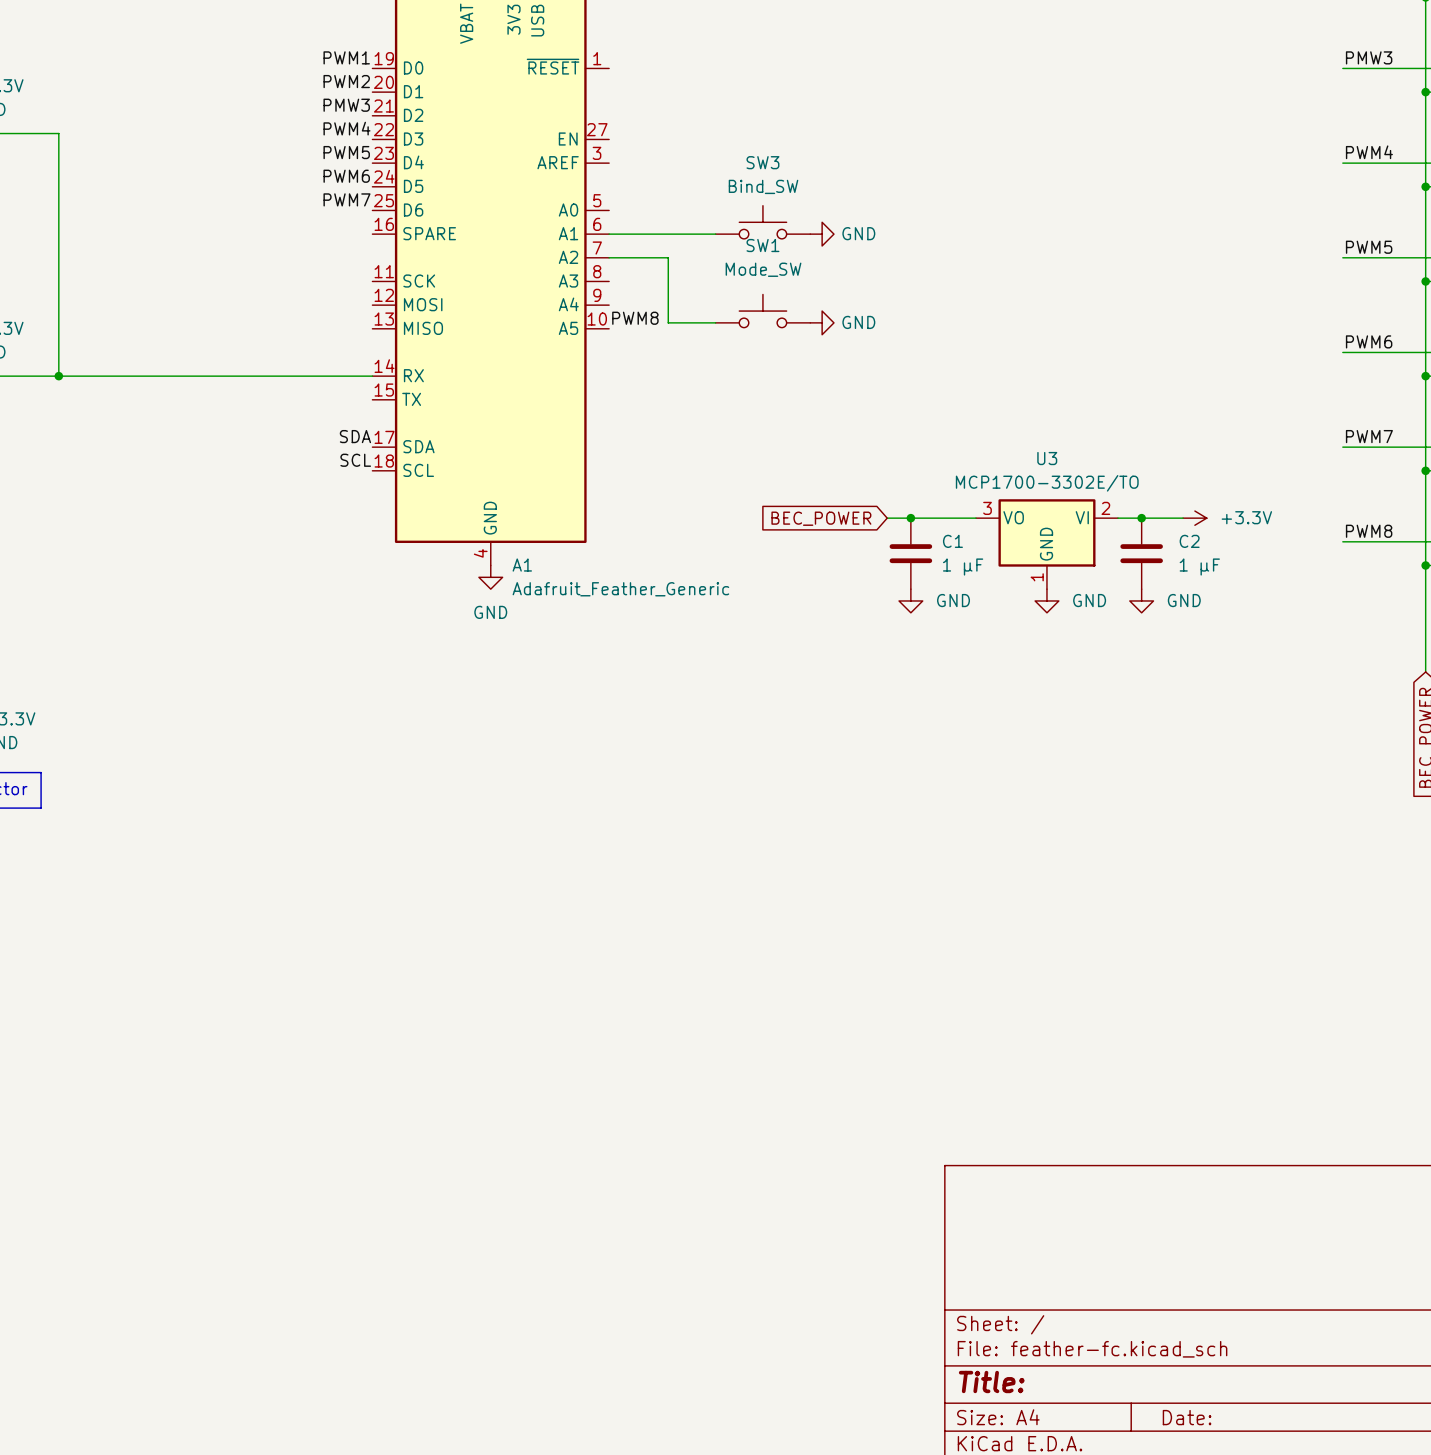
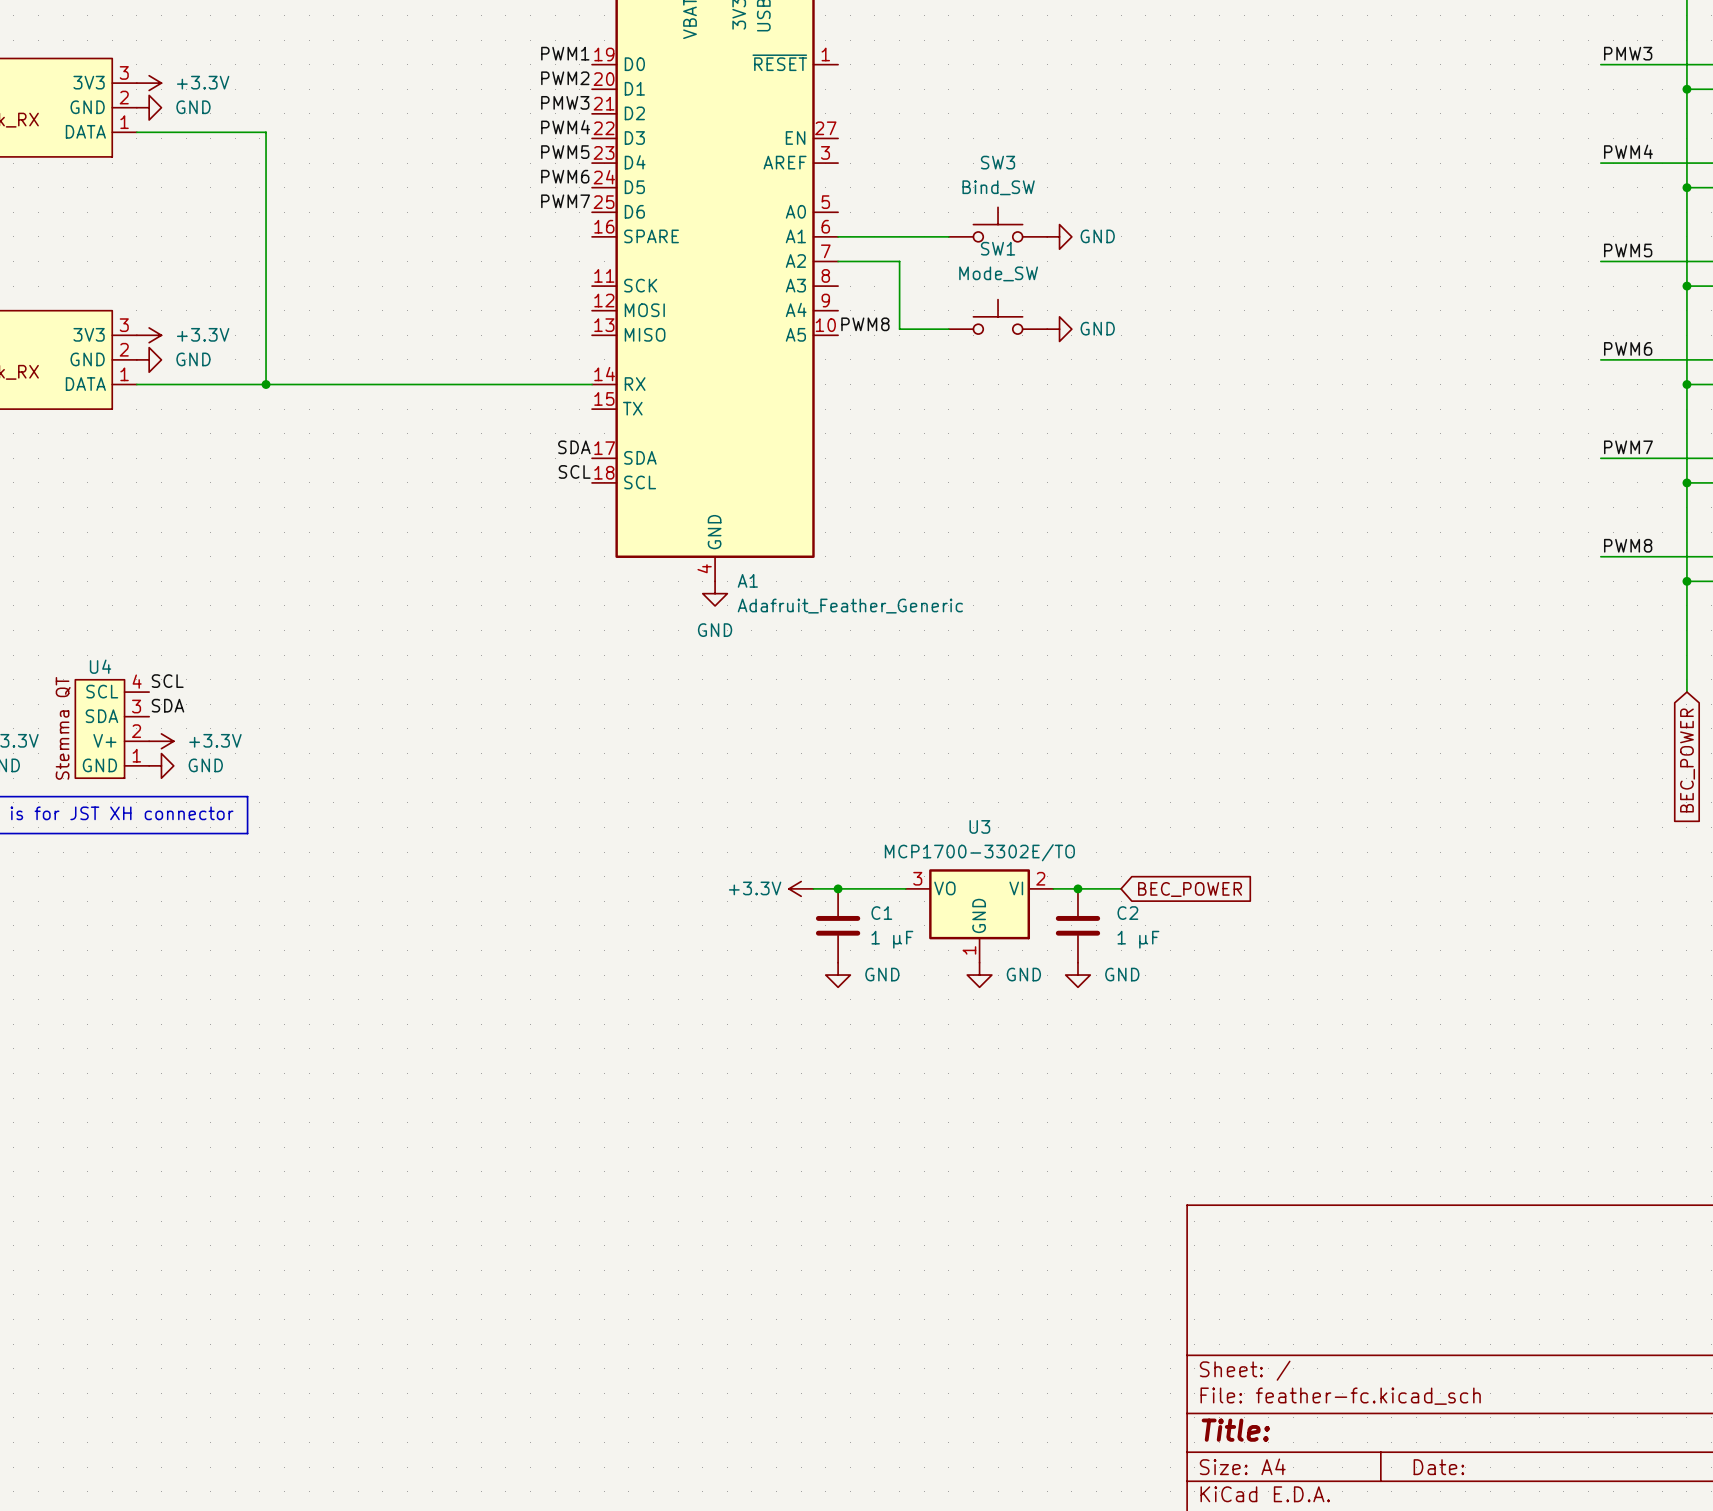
global label: BEC_POWER (821, 518) -> none
wire: (887, 518) (975, 518) -> none
junction: (910, 518) -> none
wire: (1117, 518) (1183, 518) -> none
junction: (1141, 518) -> none
power symbol: +3.3V (1194, 518) -> none
U3 position: (1046, 544) -> (979, 915)
C1 position: (910, 553) -> (838, 925)
C2 position: (1141, 553) -> (1077, 925)
power symbol: GND (910, 600) -> none
power symbol: GND (1046, 600) -> none
power symbol: GND (1141, 600) -> none
power symbol: none -> +3.3V (801, 888)
wire: none -> (813, 888) (905, 888)
junction: none -> (838, 888)
wire: none -> (1053, 888) (1121, 888)
junction: none -> (1077, 888)
global label: none -> BEC_POWER (1190, 889)
power symbol: none -> GND (838, 975)
power symbol: none -> GND (979, 975)
power symbol: none -> GND (1077, 975)

